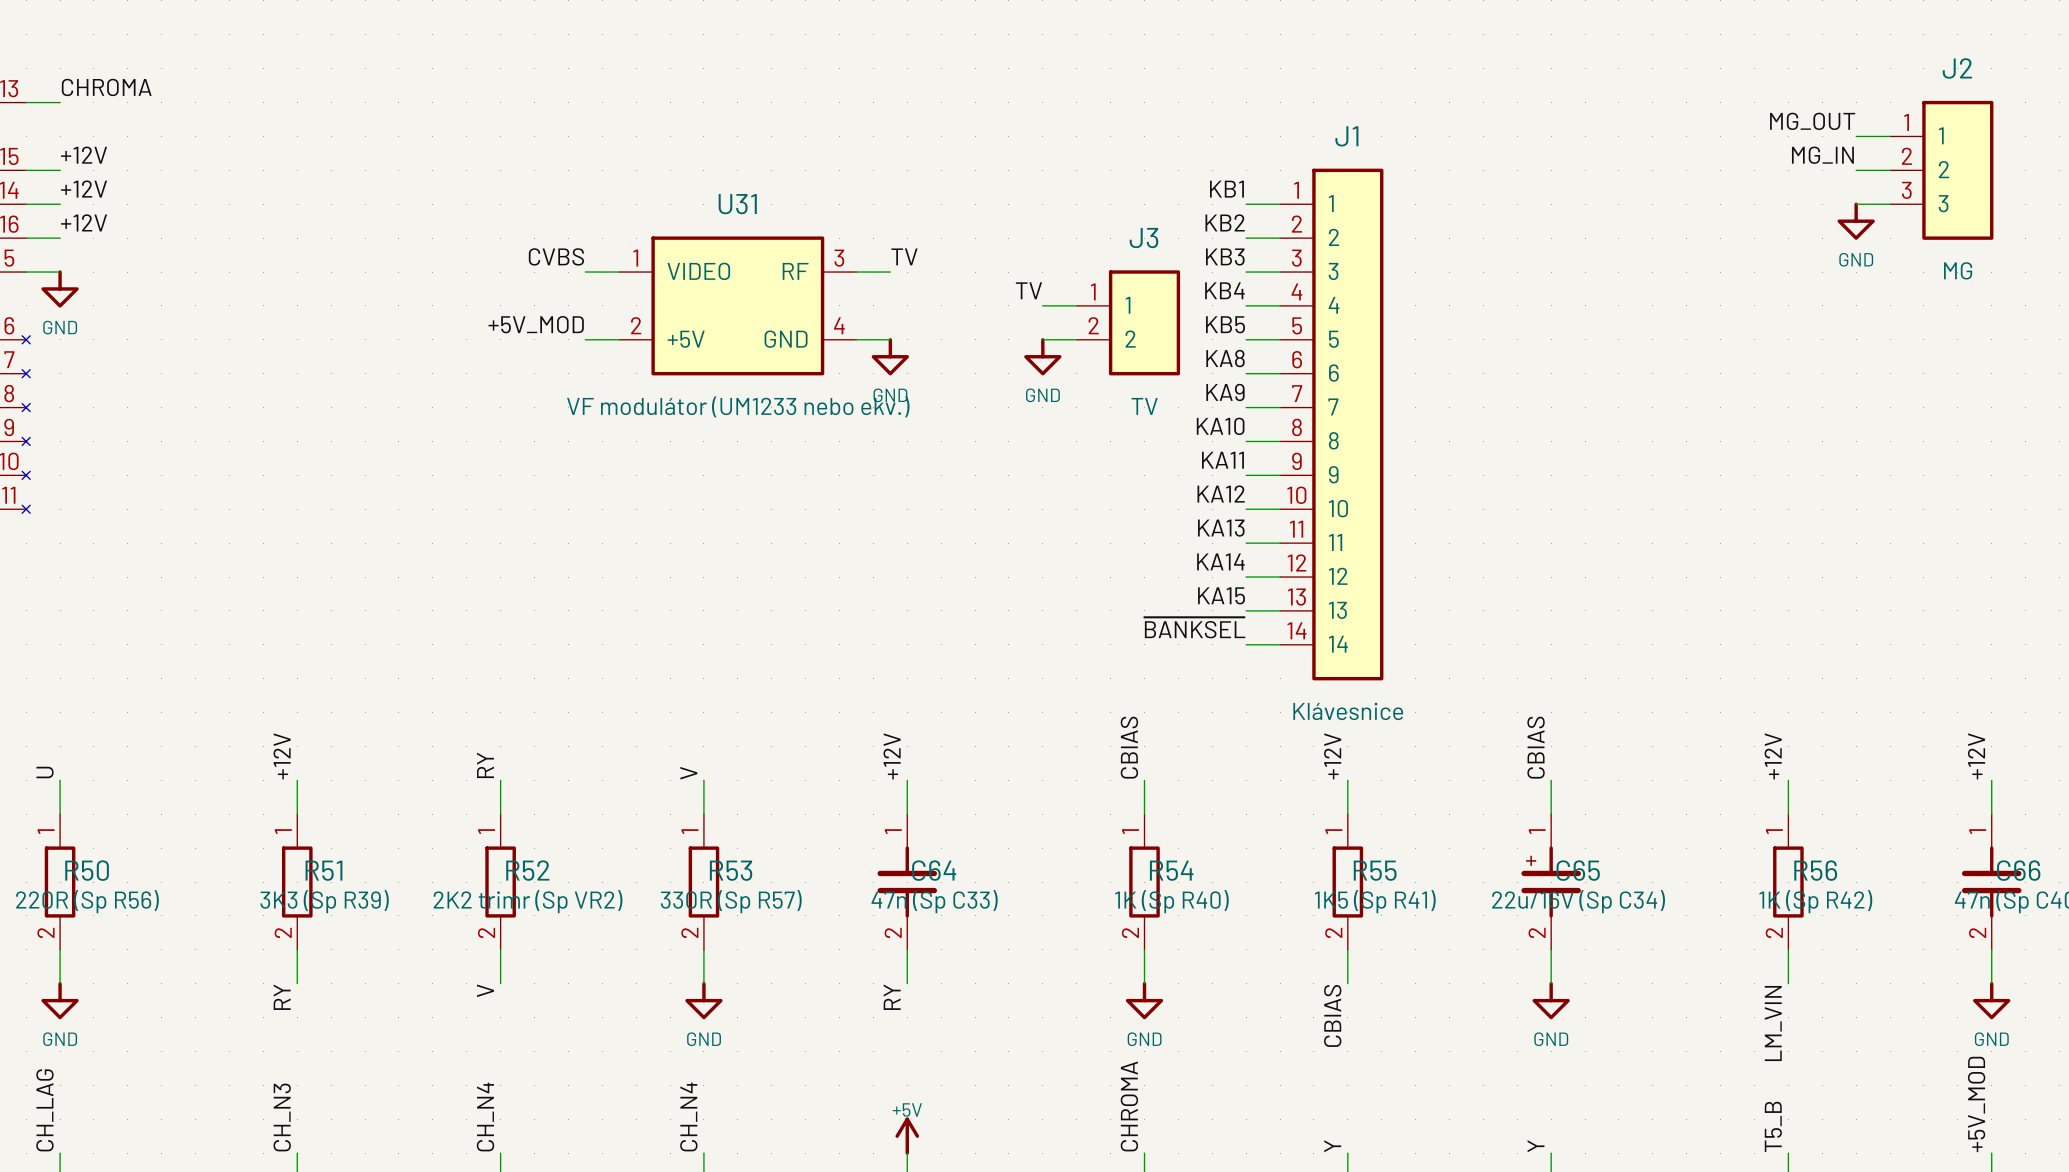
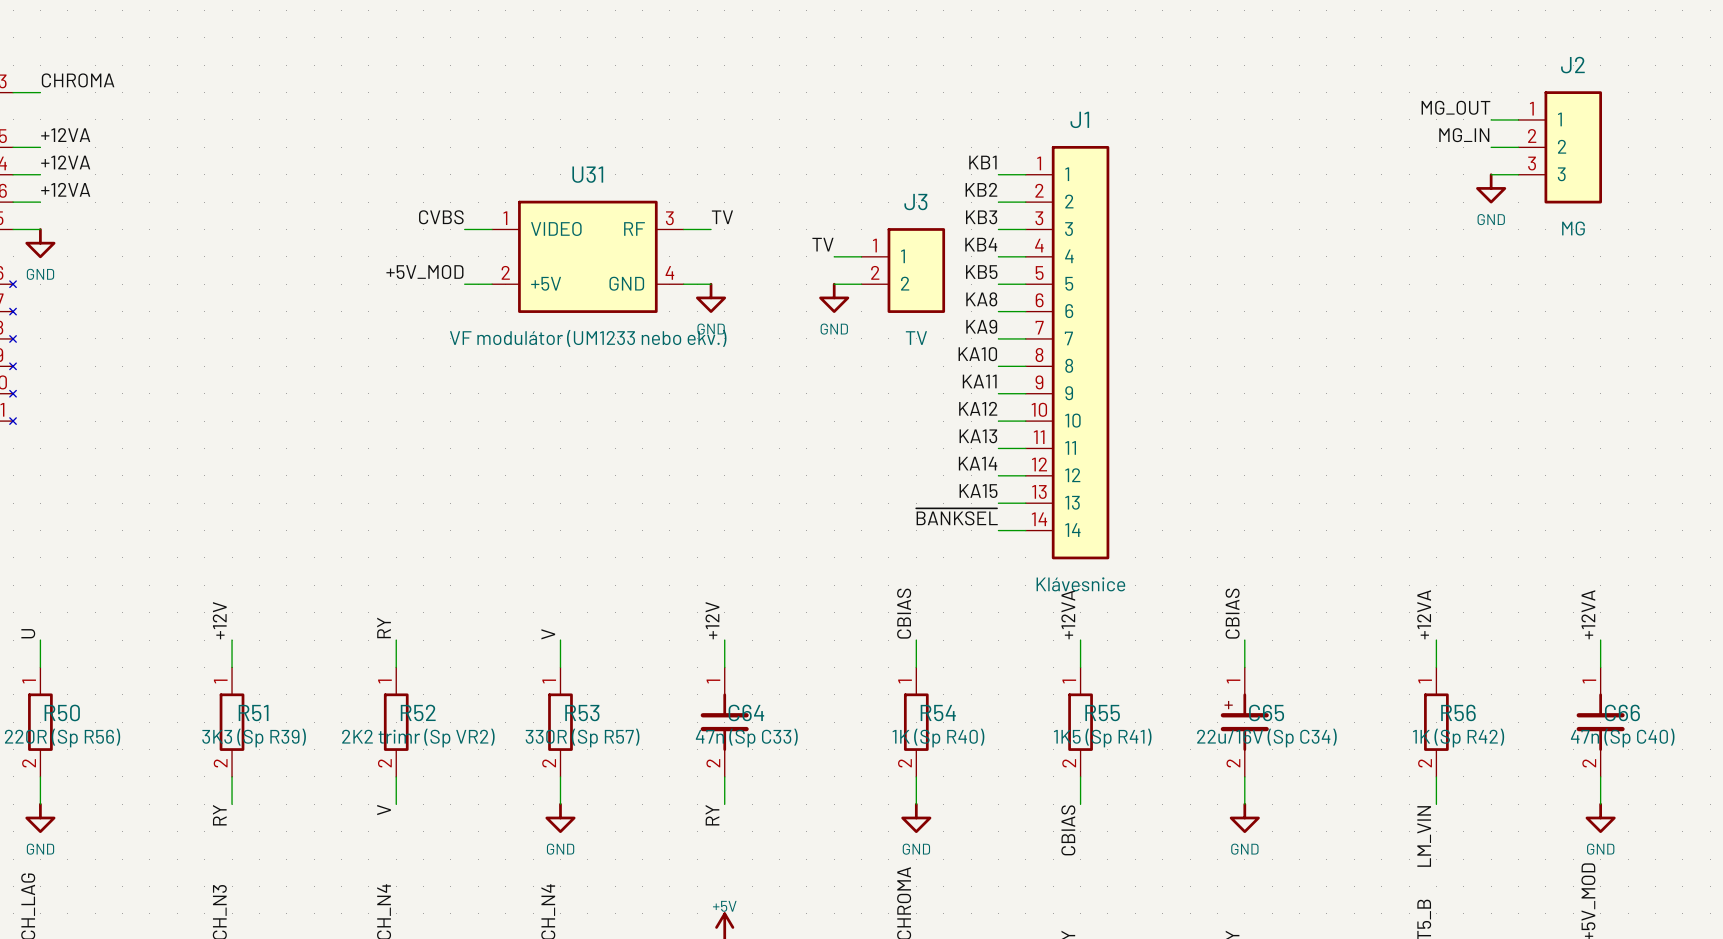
label: +12V (84, 155) -> +12VA (65, 135)
label: +12V (84, 189) -> +12VA (65, 162)
label: +12V (84, 222) -> +12VA (65, 189)
label: +12V (1332, 756) -> +12VA (1068, 614)
label: +12V (1773, 756) -> +12VA (1424, 614)
label: +12V (1976, 756) -> +12VA (1588, 614)

